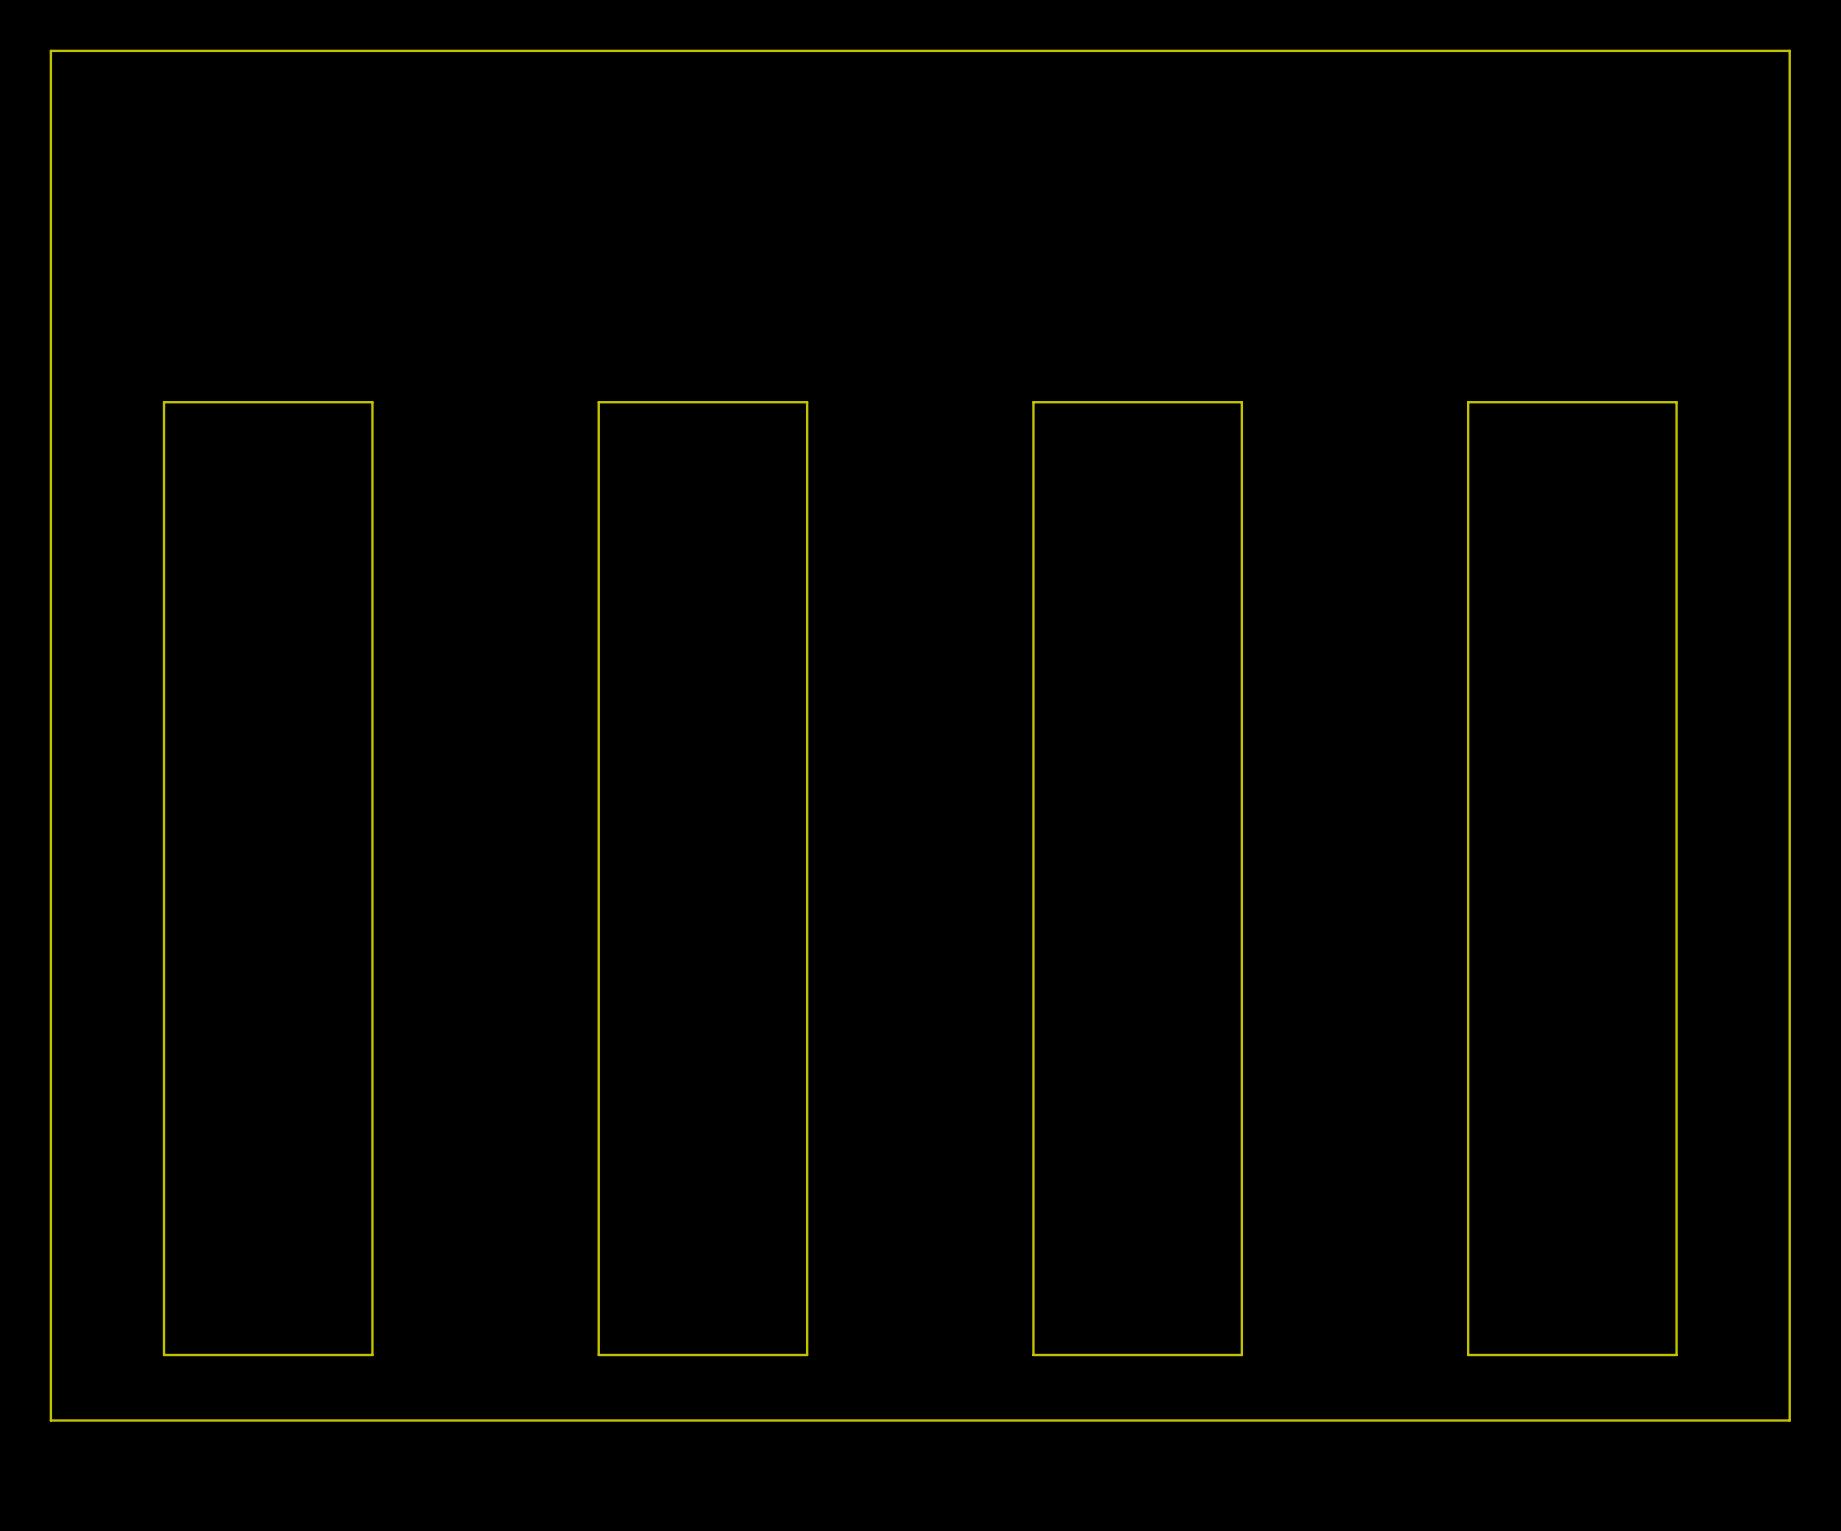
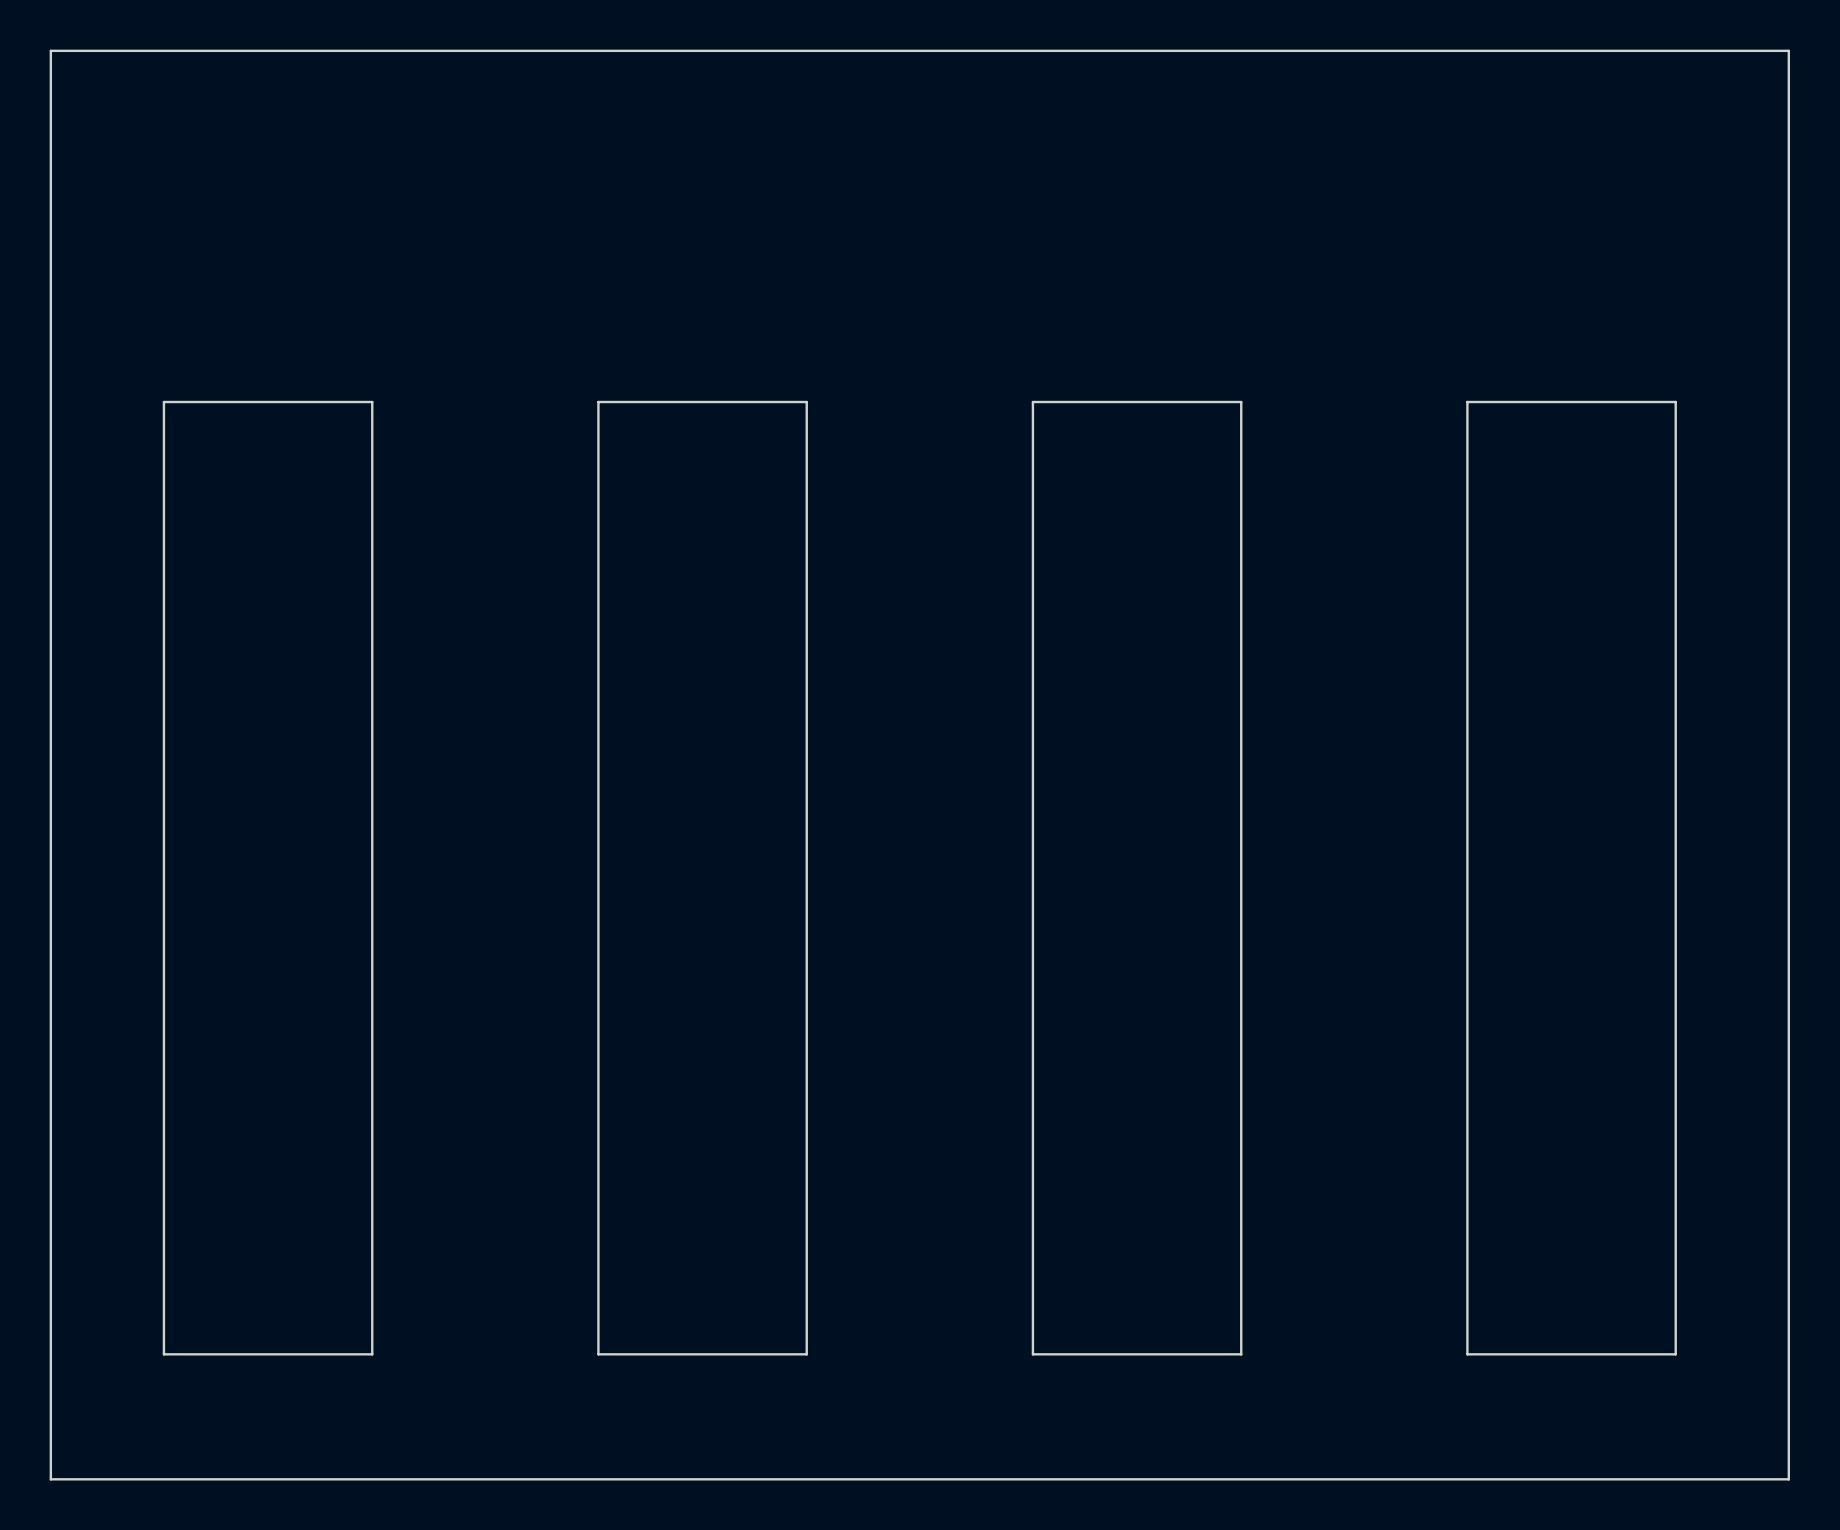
board edge: (1789, 1420) (50, 1420) -> (1788, 1419) (1788, 1479) (50, 1479) (50, 1419)

